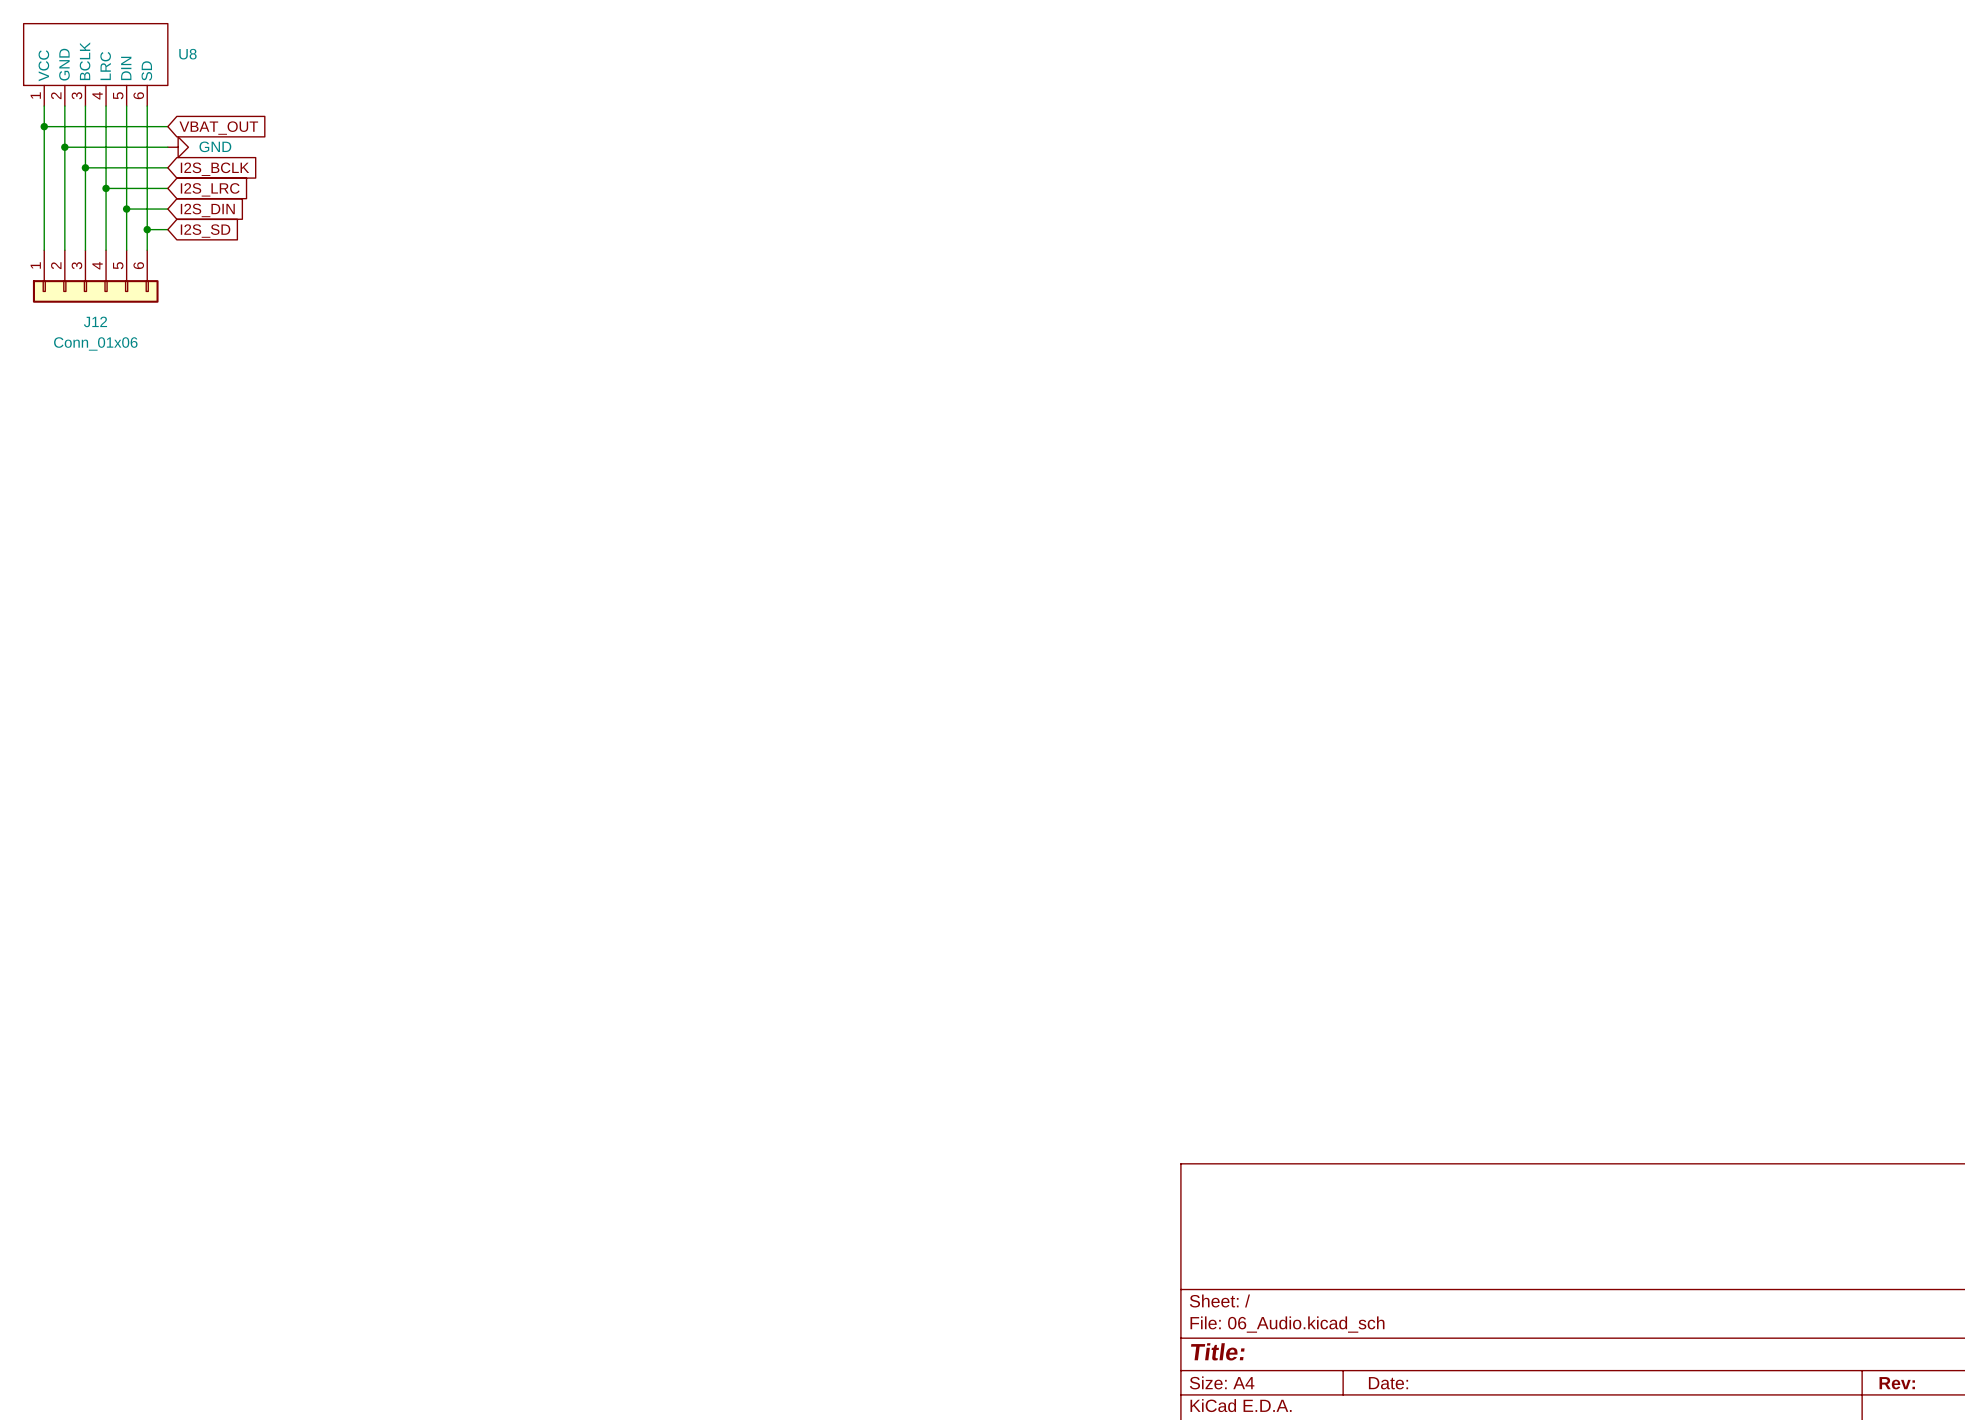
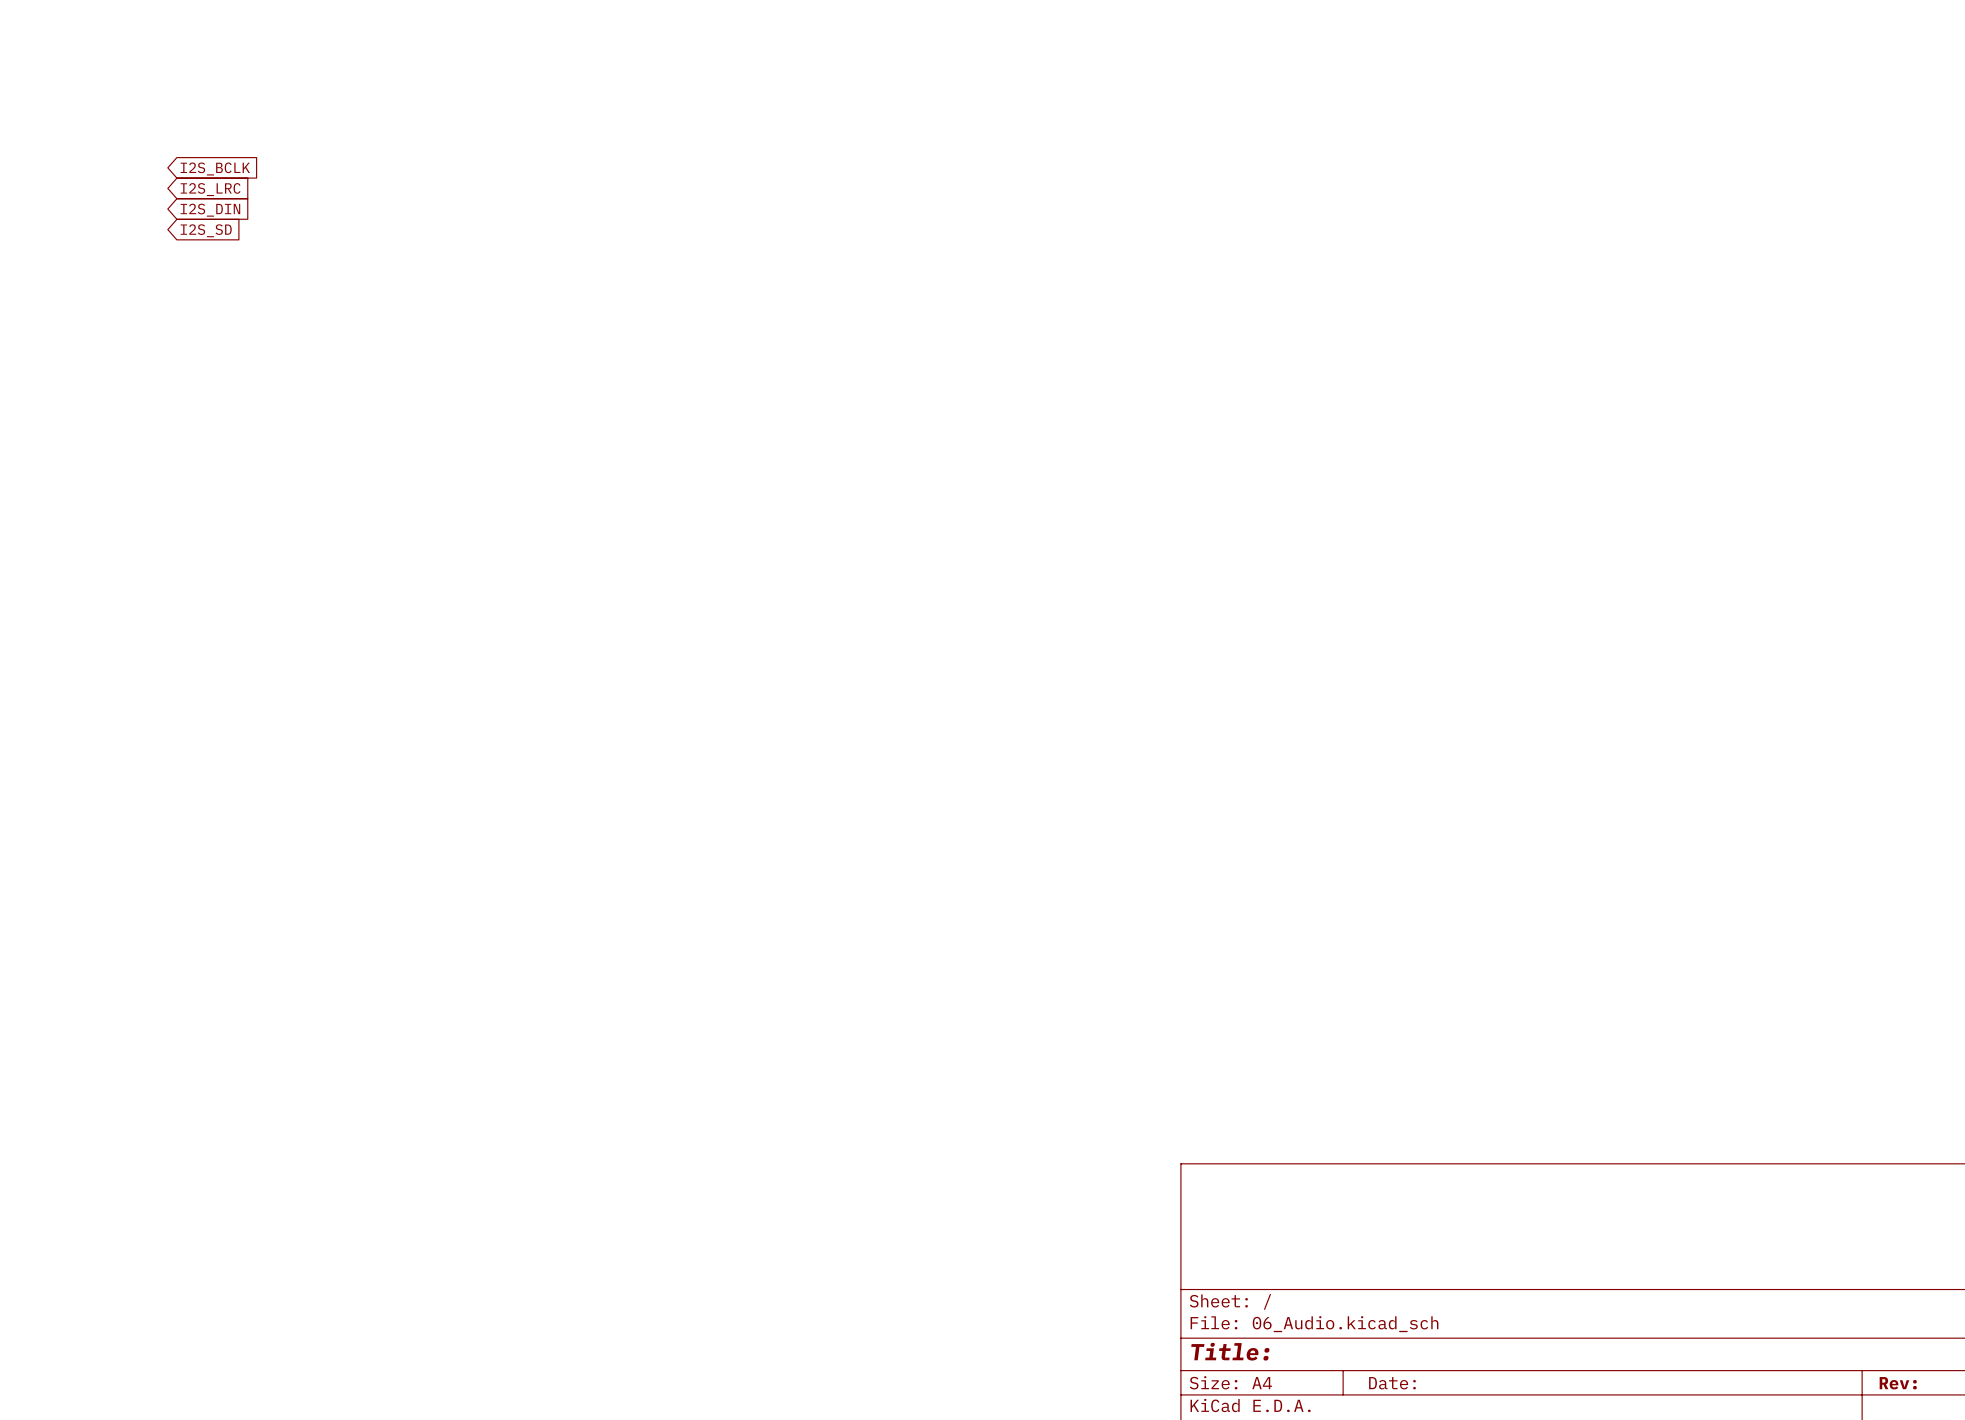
U8: (95, 64) -> none
wire: (44, 106) (44, 250) -> none
wire: (64, 106) (64, 250) -> none
wire: (85, 106) (85, 250) -> none
wire: (106, 106) (106, 250) -> none
wire: (126, 106) (126, 250) -> none
wire: (147, 106) (147, 250) -> none
wire: (44, 126) (167, 126) -> none
junction: (44, 126) -> none
global label: VBAT_OUT (218, 128) -> none
wire: (64, 147) (167, 147) -> none
junction: (64, 147) -> none
power symbol: GND (178, 147) -> none
wire: (85, 167) (167, 167) -> none
junction: (85, 167) -> none
wire: (106, 188) (167, 188) -> none
junction: (106, 188) -> none
wire: (126, 209) (167, 209) -> none
junction: (126, 209) -> none
wire: (147, 229) (167, 229) -> none
junction: (147, 229) -> none
J12: Conn_01x06 (95, 276) -> none

